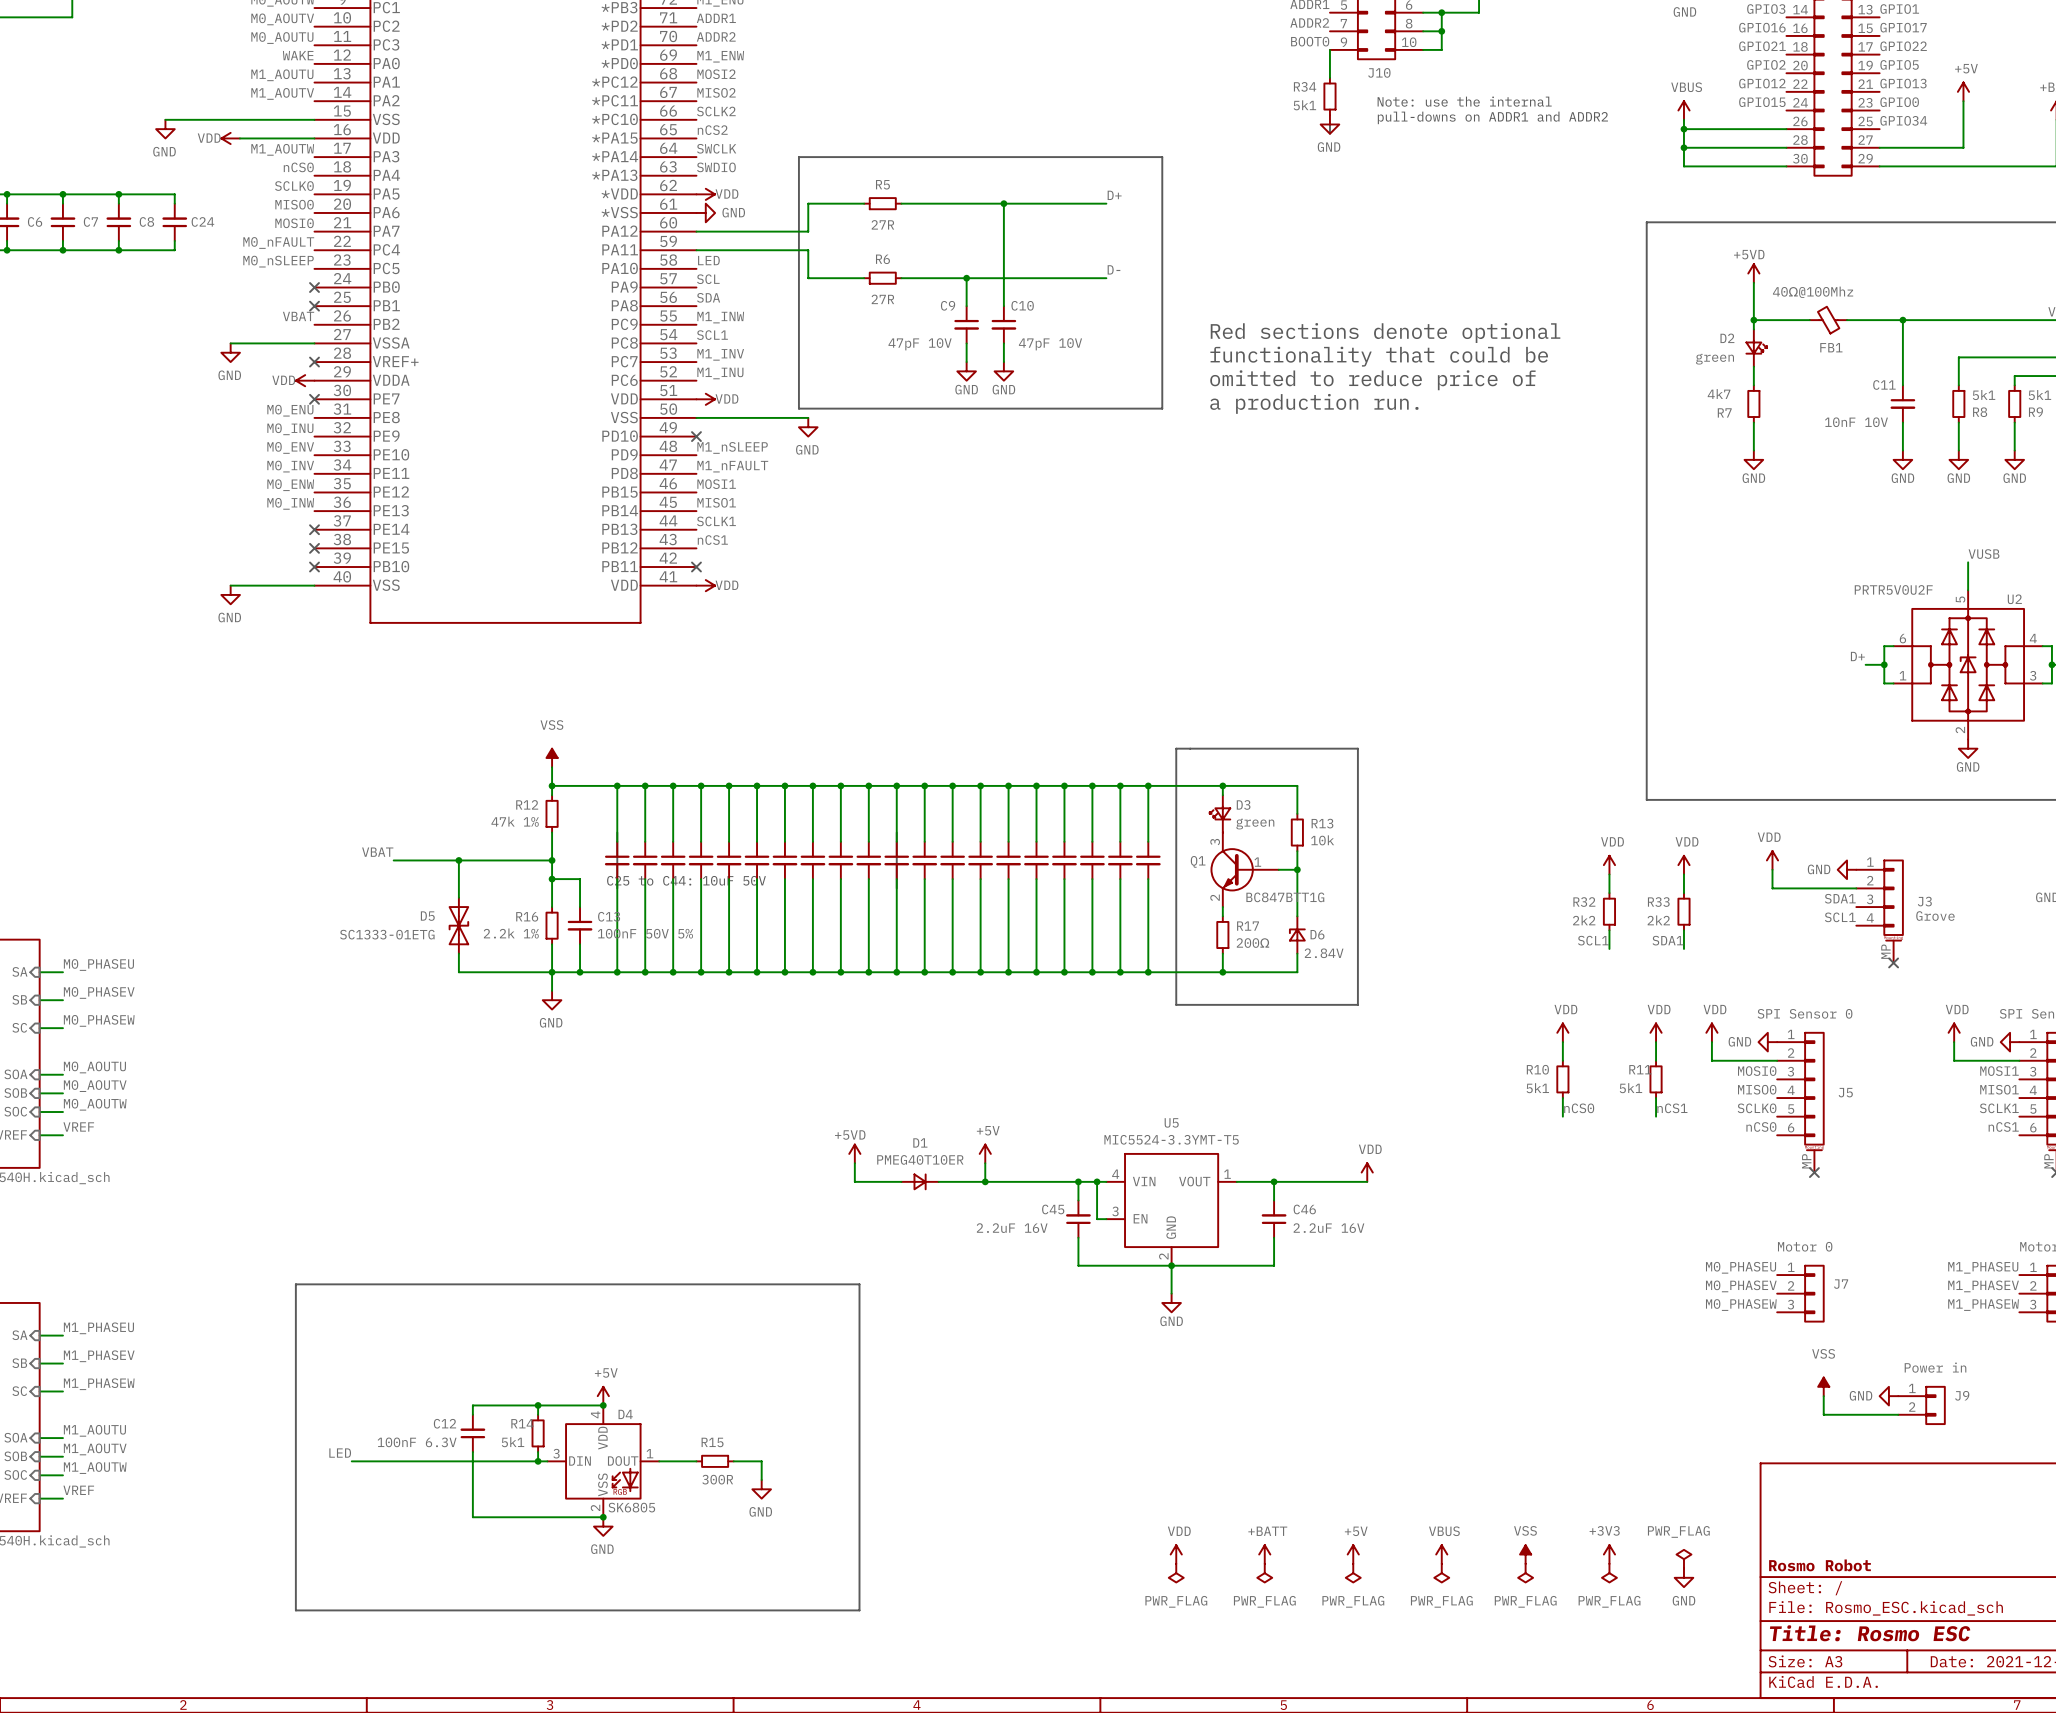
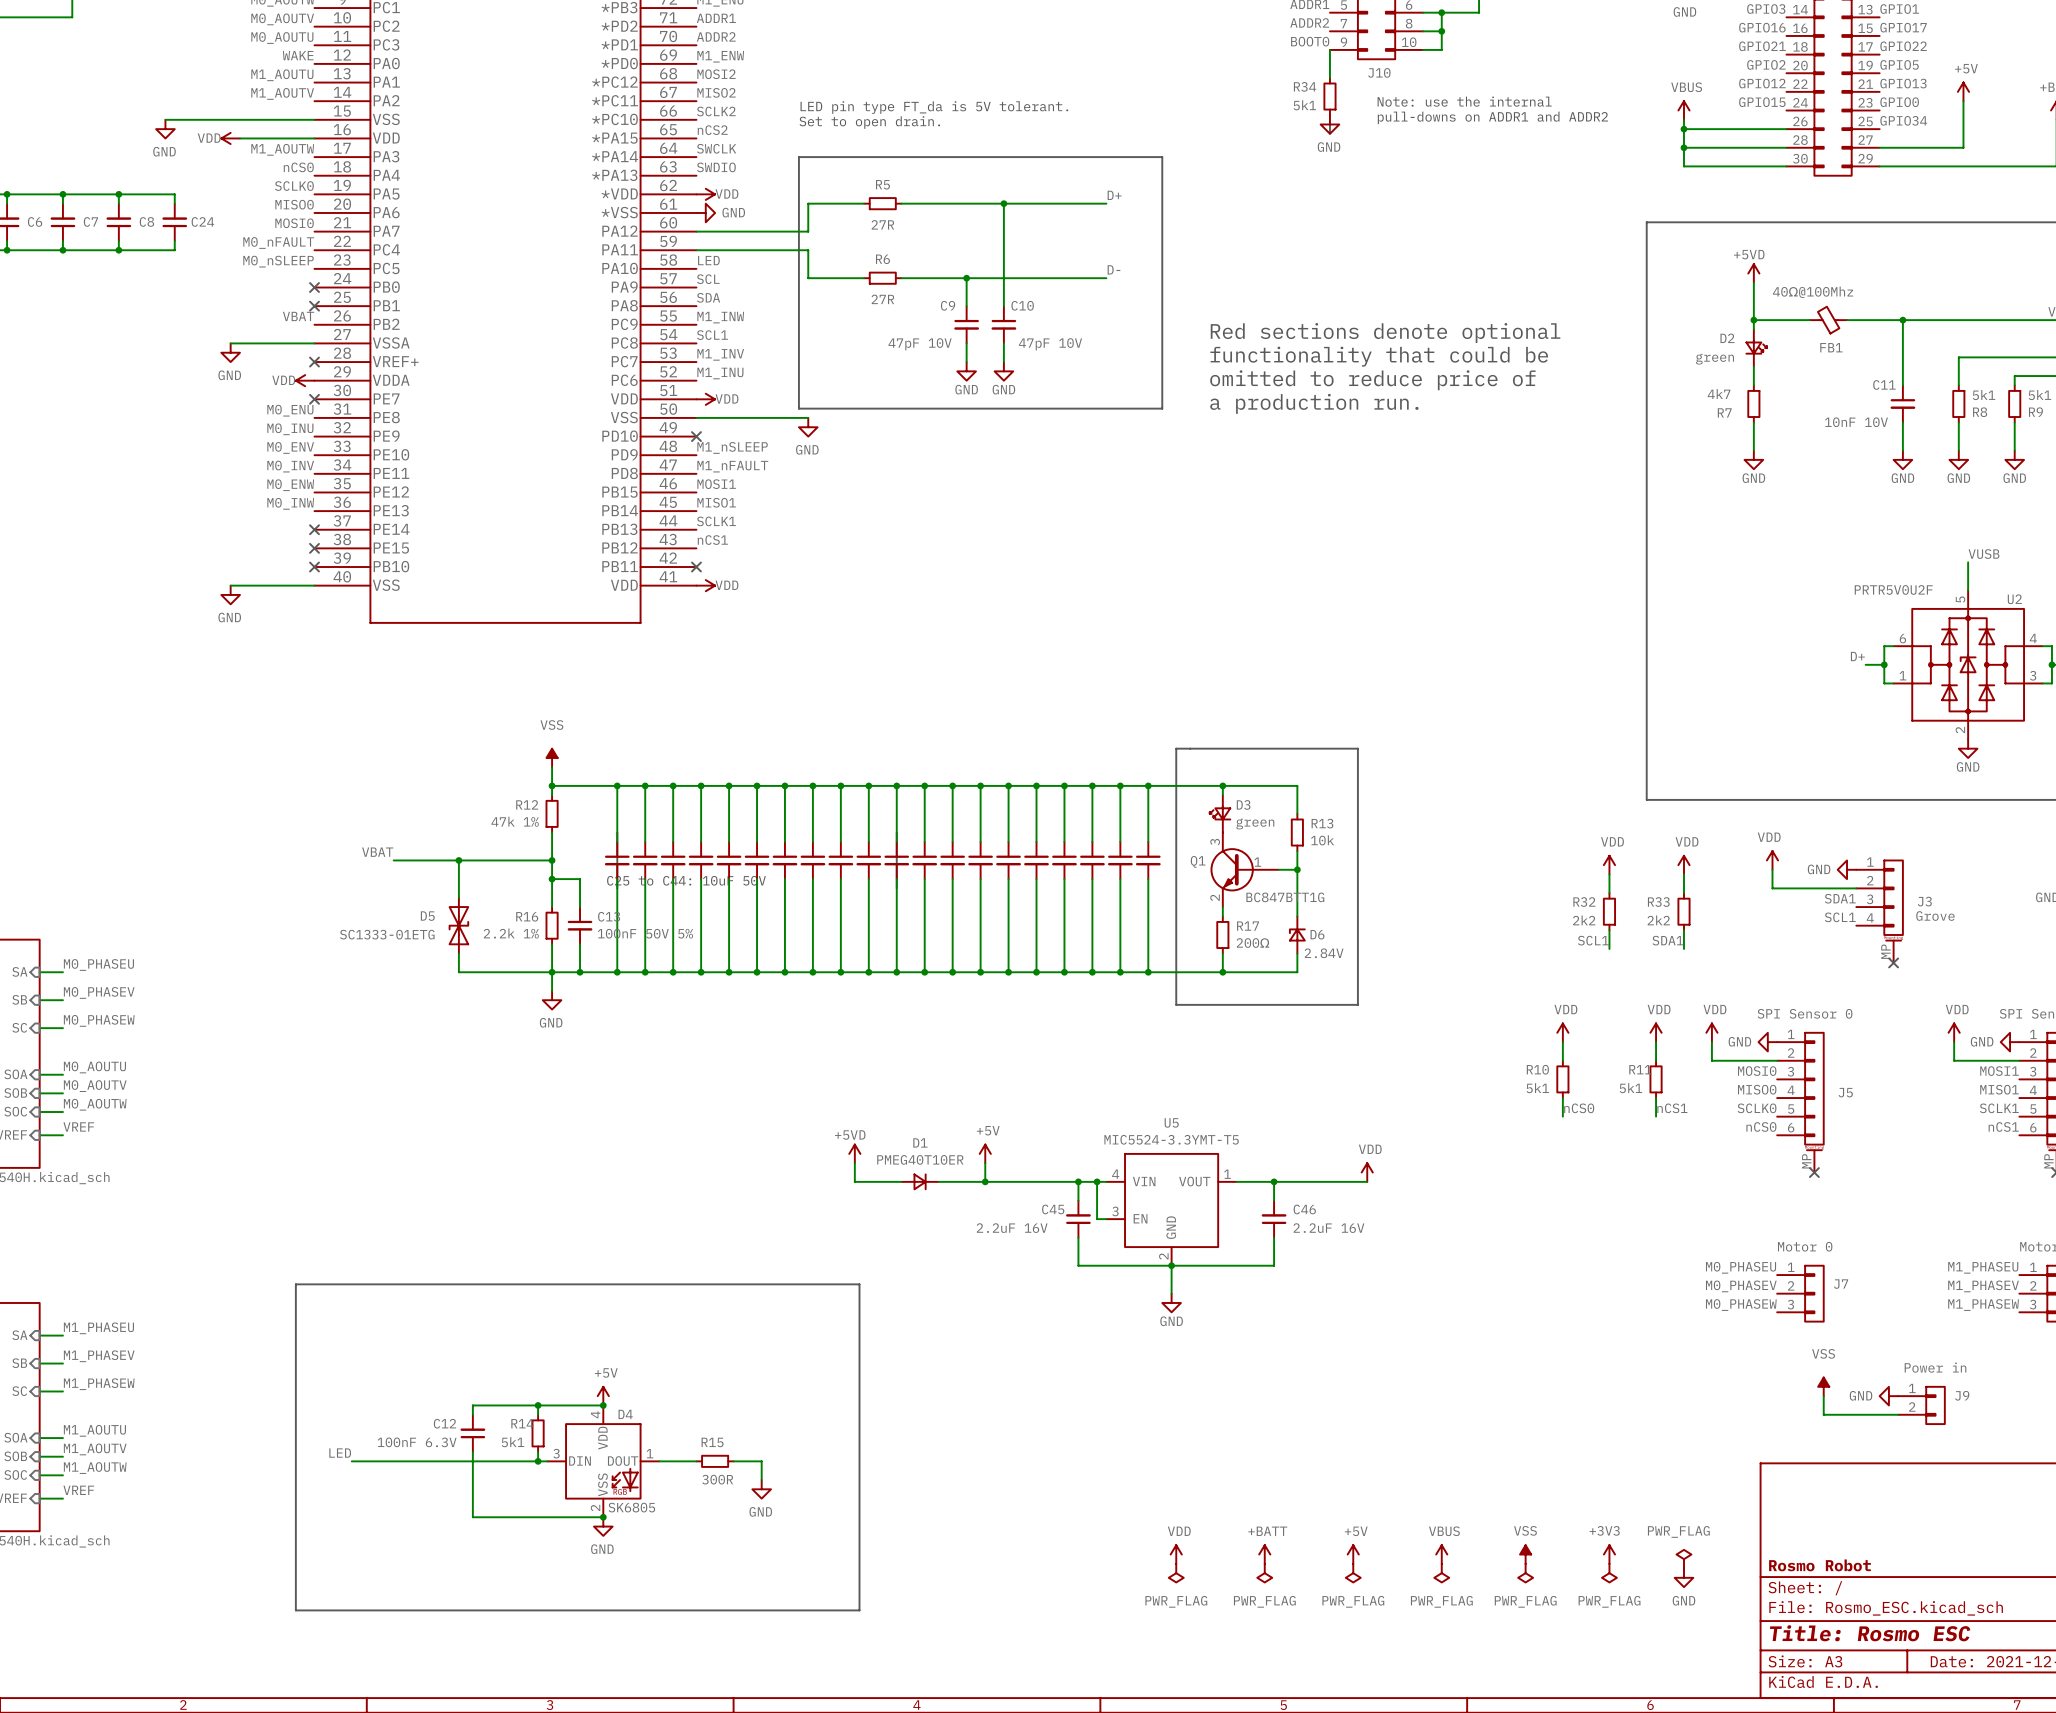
text: none -> LED pin type FT_da is 5V tolerant. (934, 107)
text: none -> Set to open drain. (869, 122)

